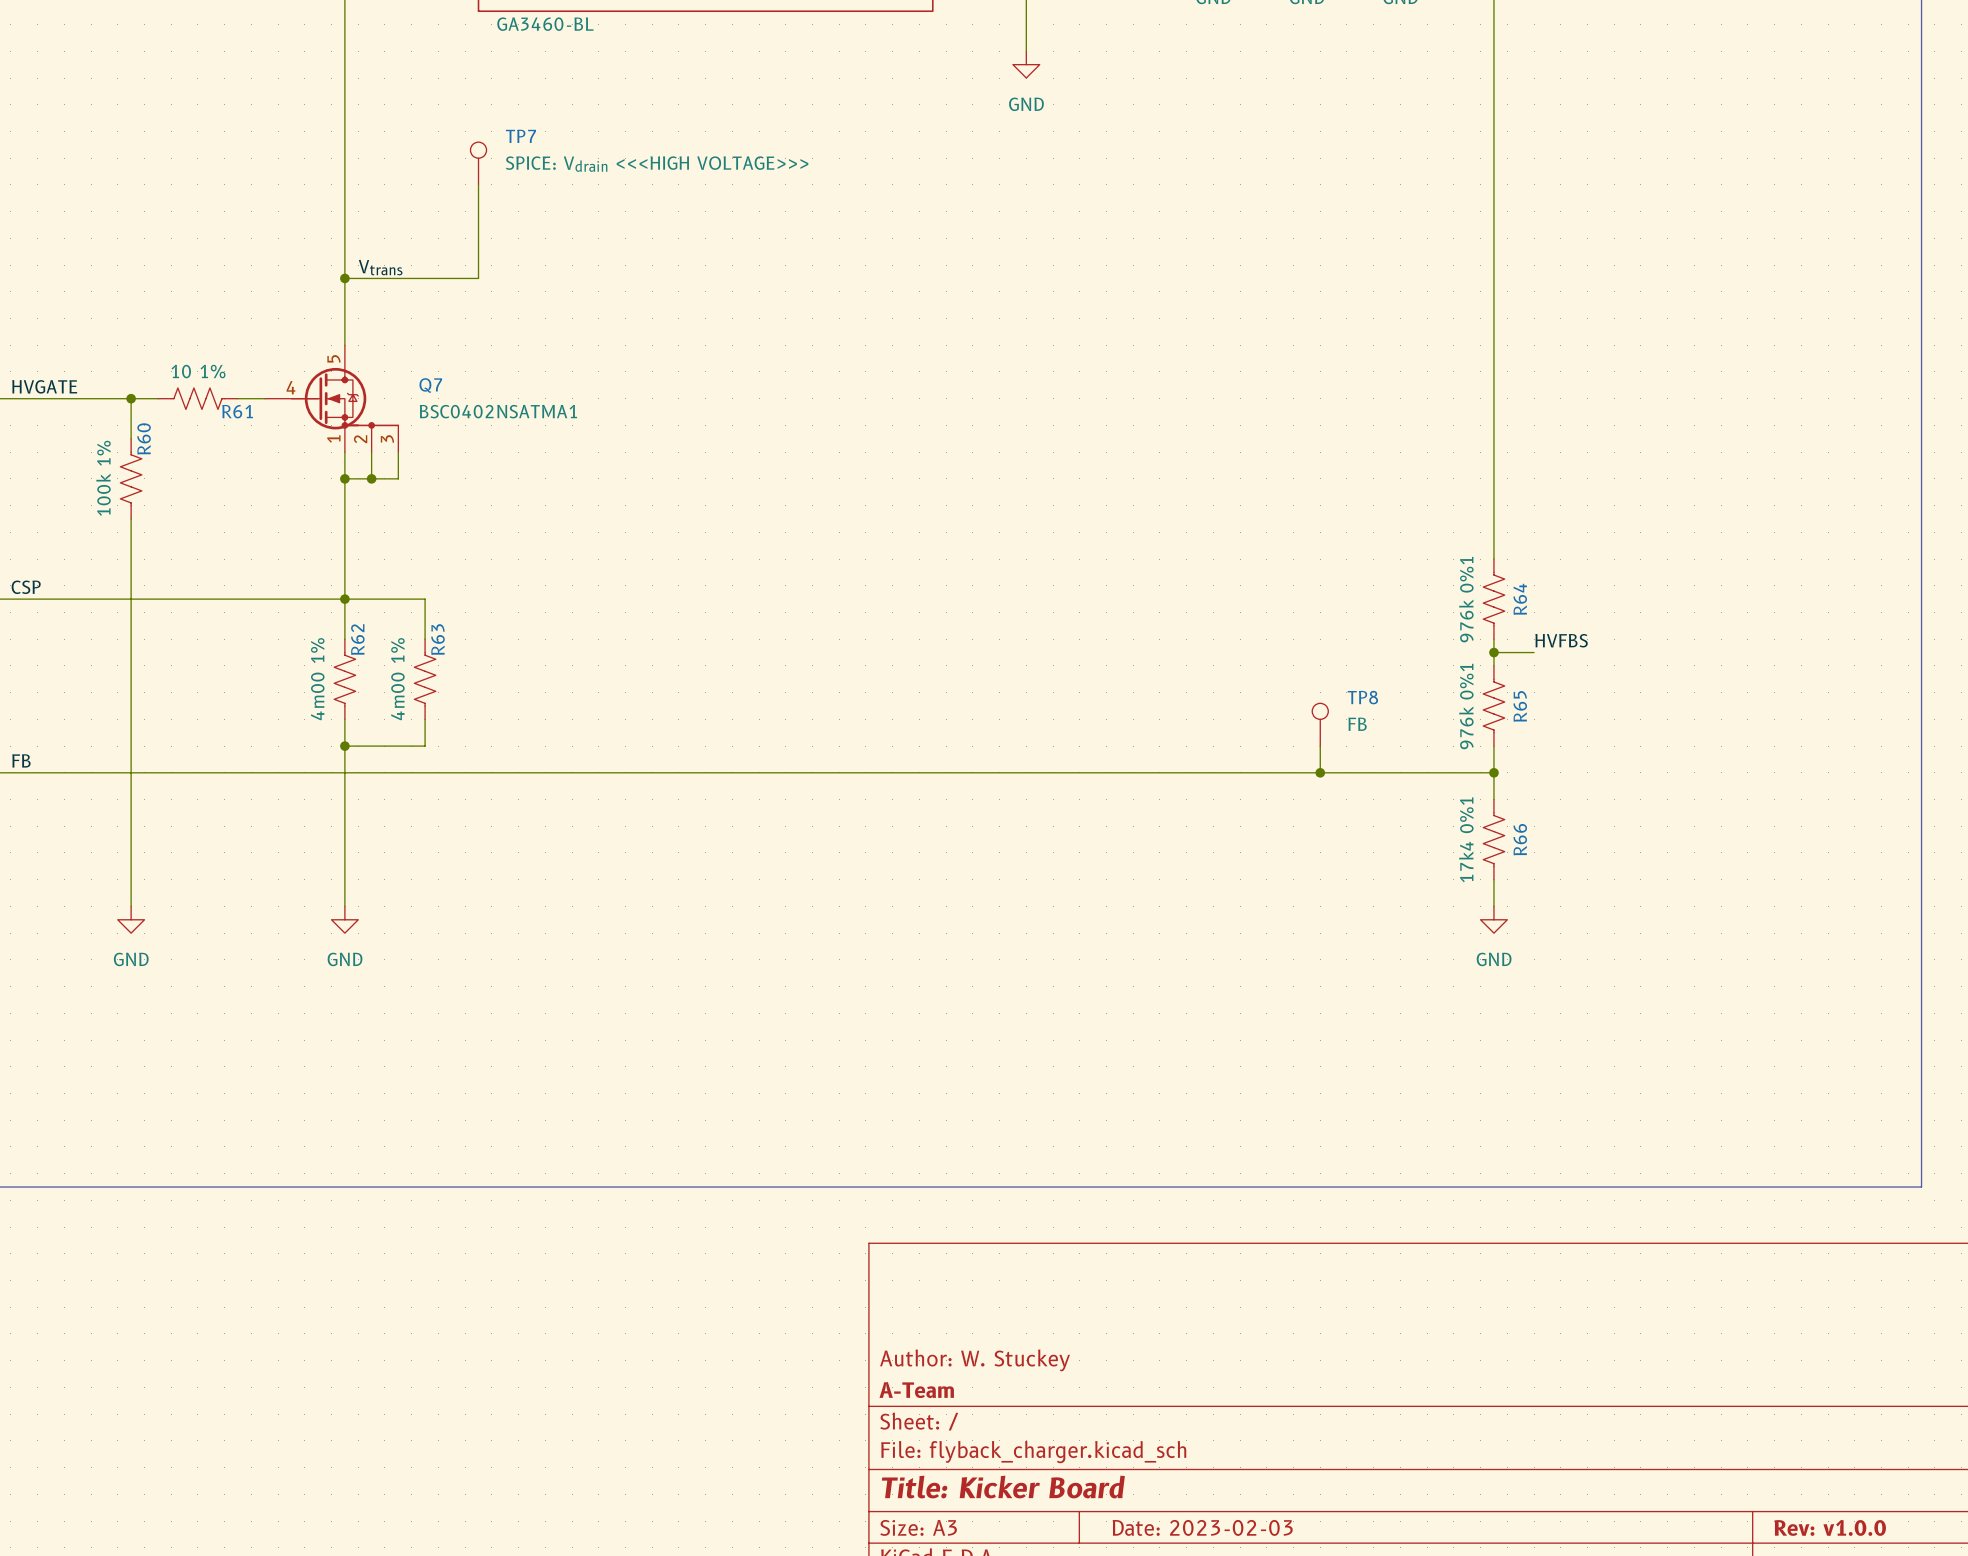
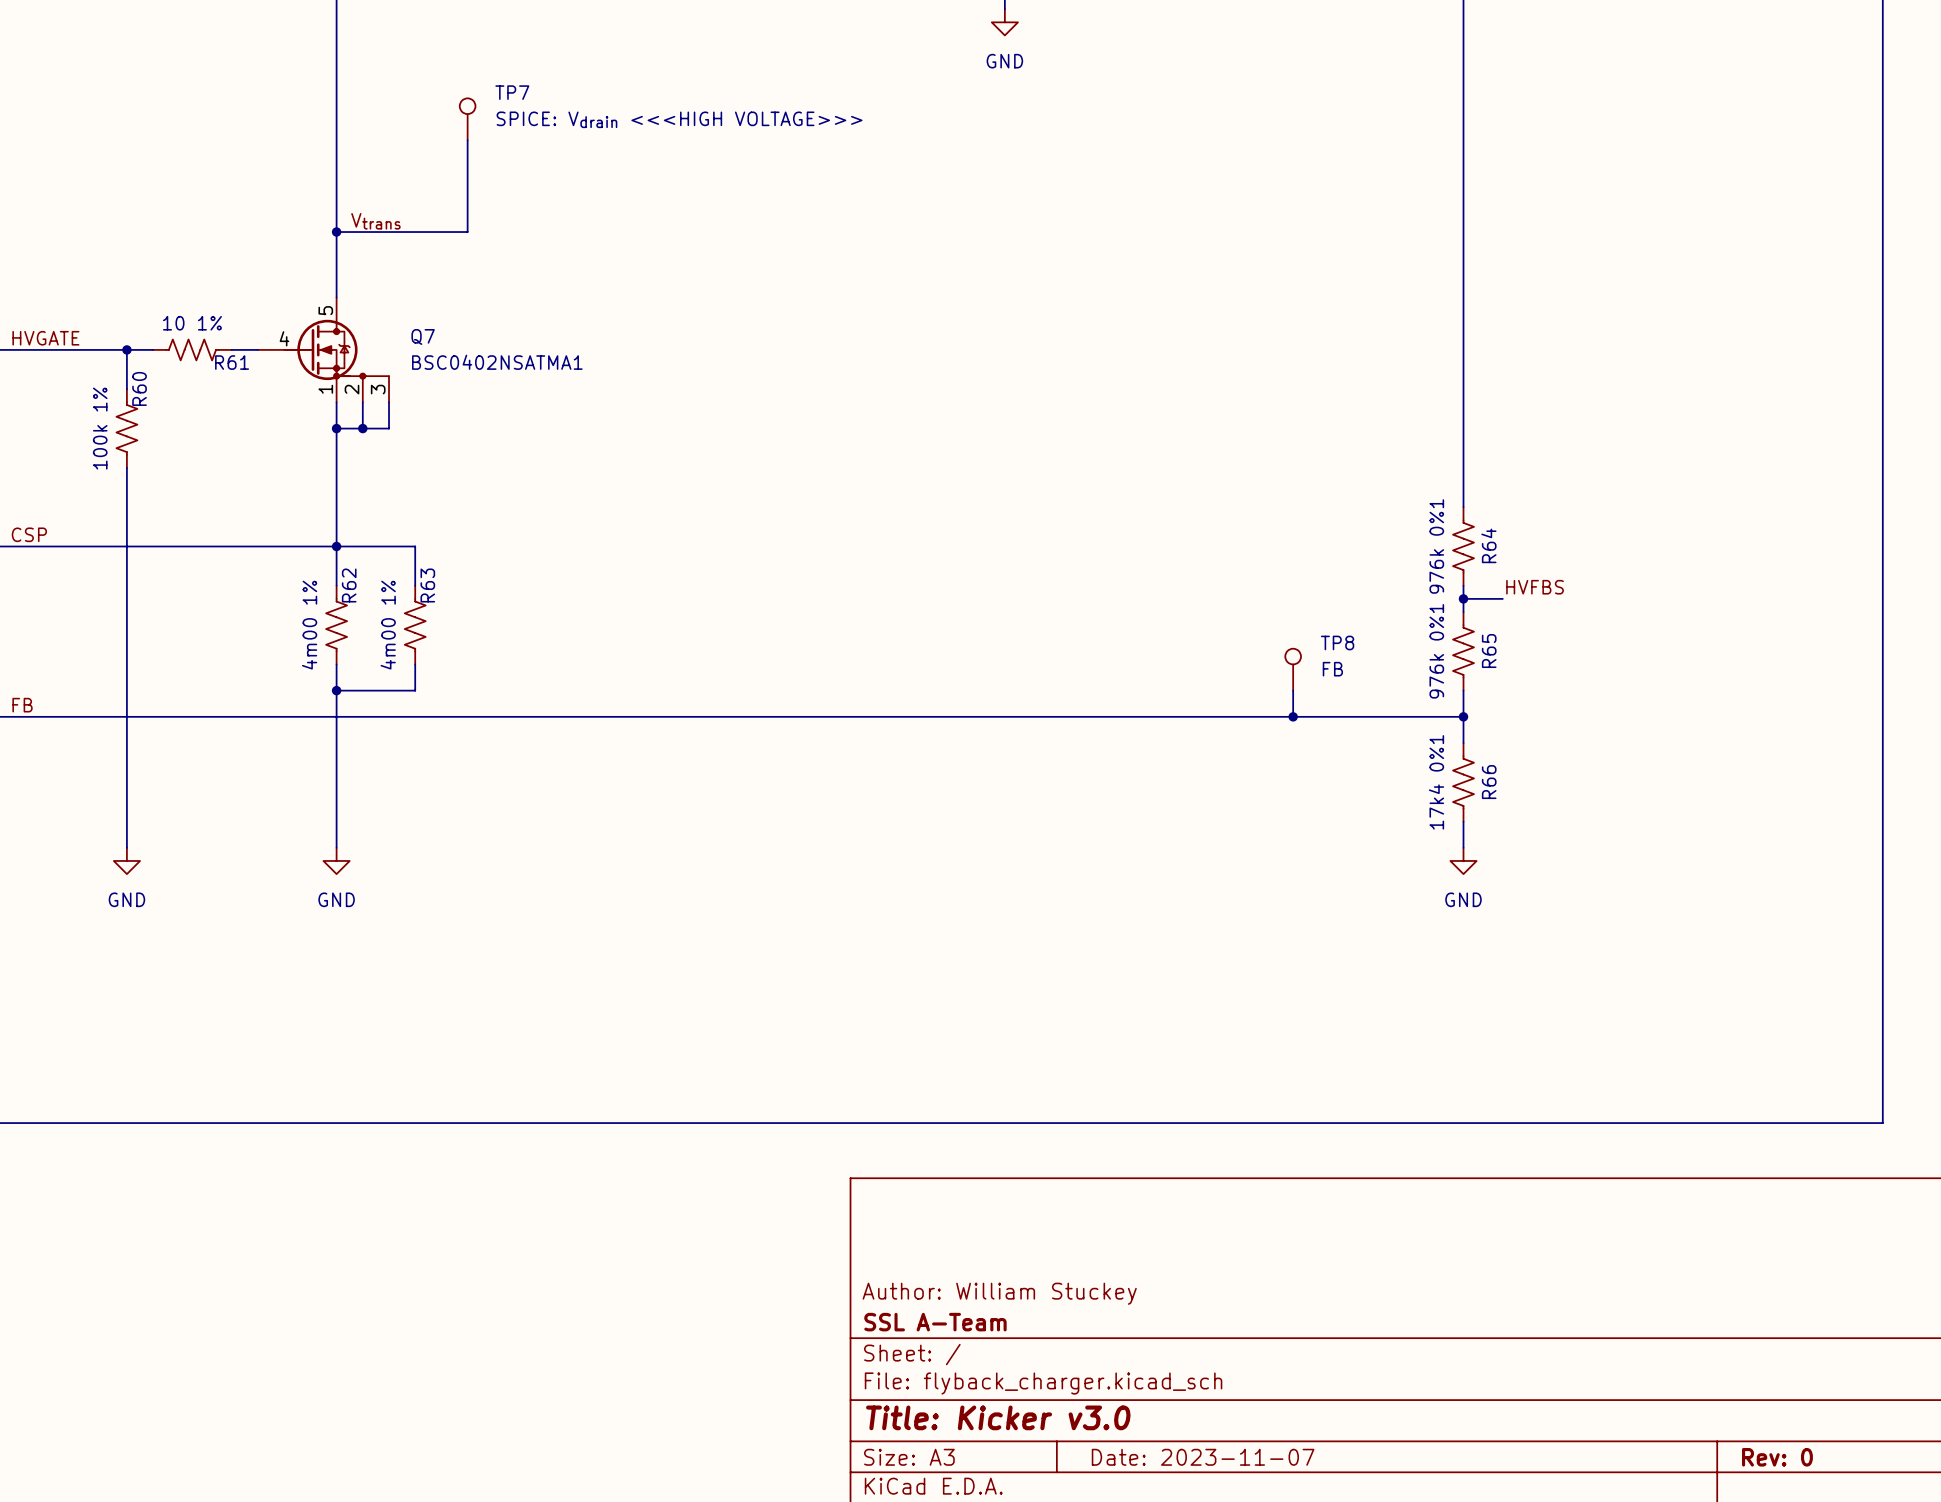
title block: Author: W. Stuckey (975, 1360) -> Author: William Stuckey (999, 1293)
title block: A-Team (916, 1390) -> SSL A-Team (935, 1322)
title block: Title: Kicker Board (1003, 1487) -> Title: Kicker v3.0 (998, 1417)
title block: Date: 2023-02-03 (1202, 1527) -> Date: 2023-11-07 (1203, 1457)
title block: Rev: v1.0.0 (1830, 1527) -> Rev: 0 (1777, 1457)

